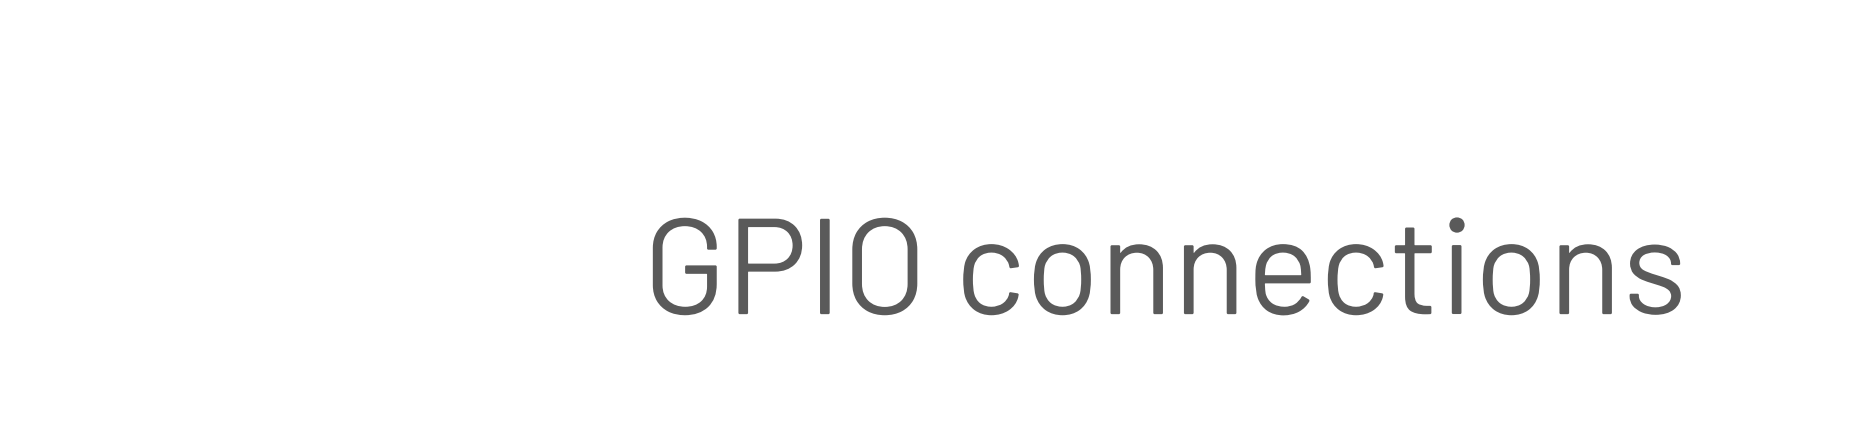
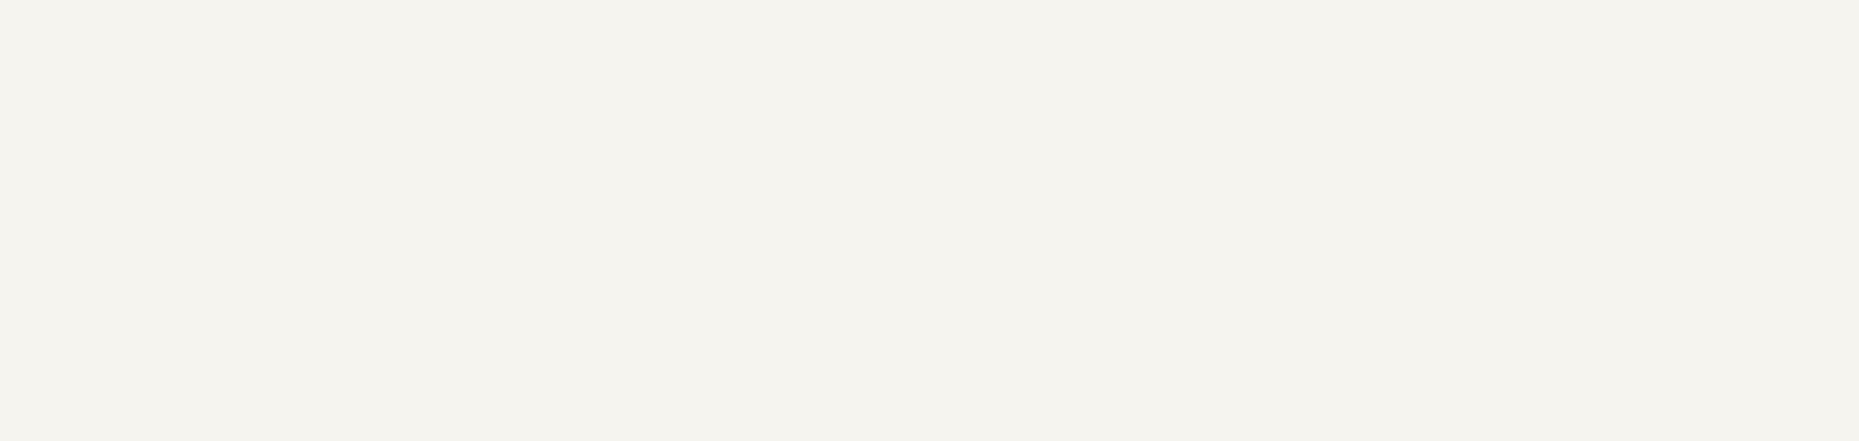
text: GPIO connections (1166, 266) -> none

